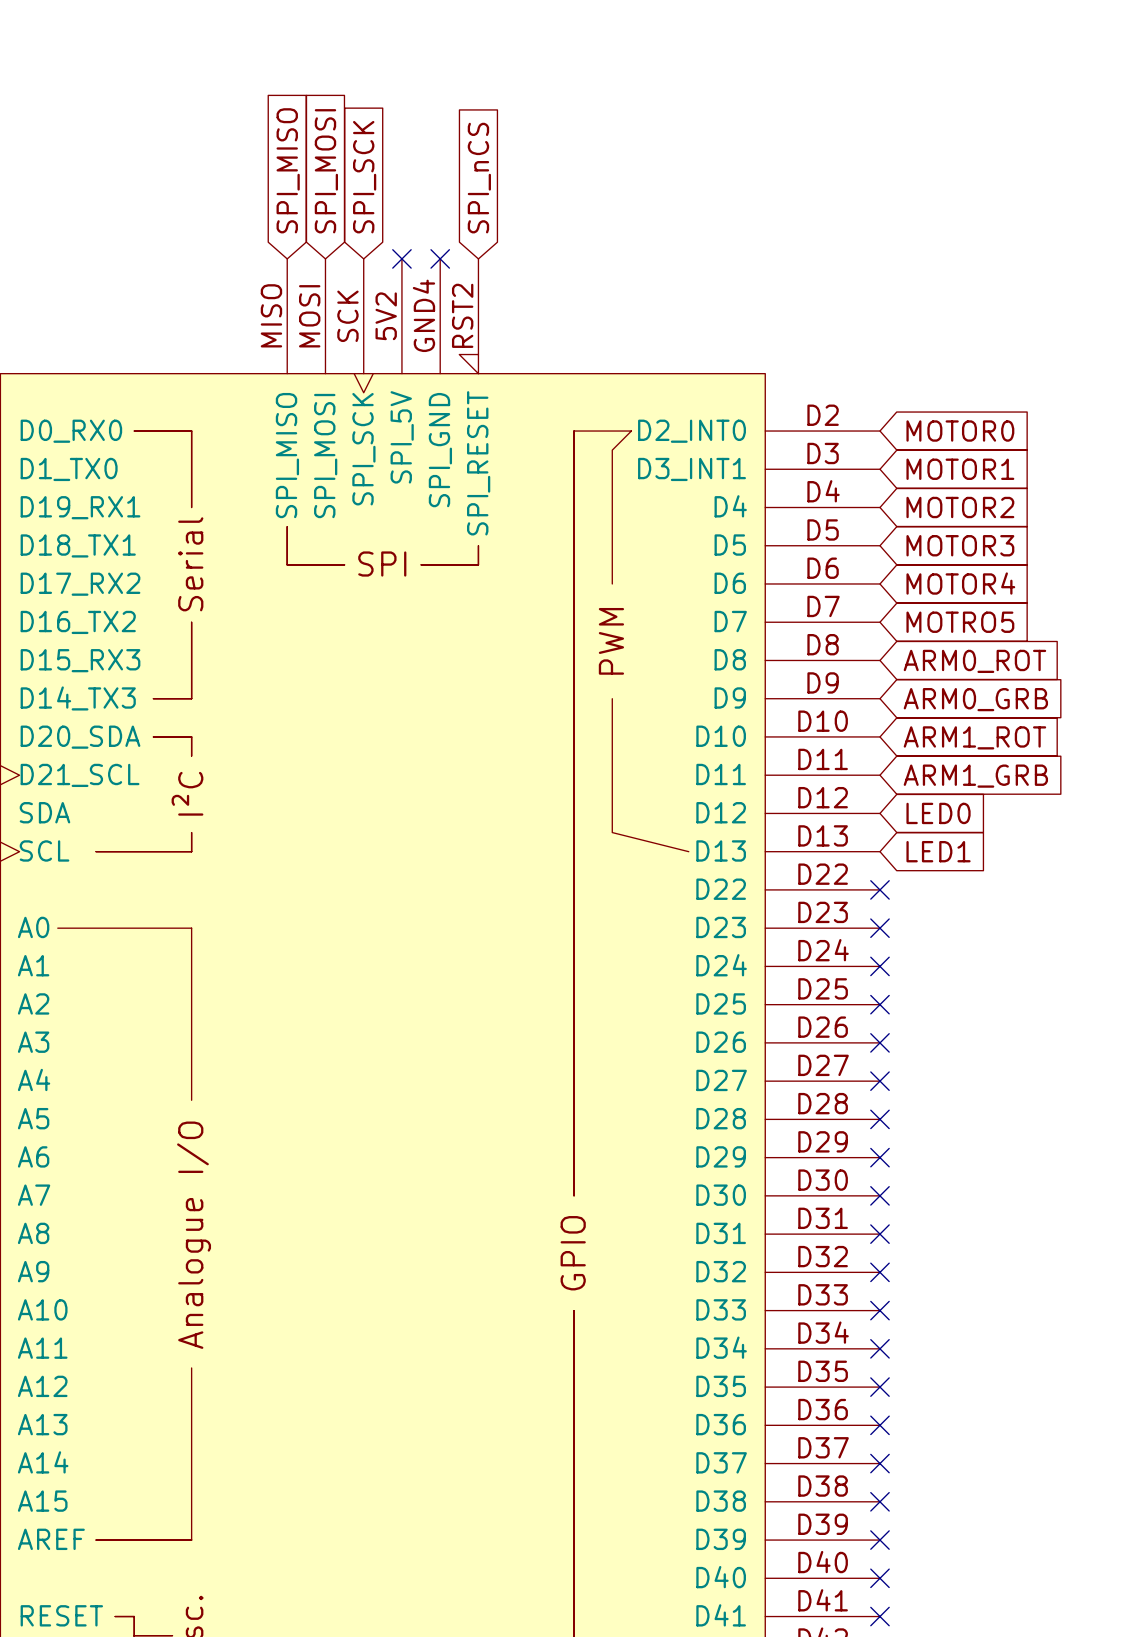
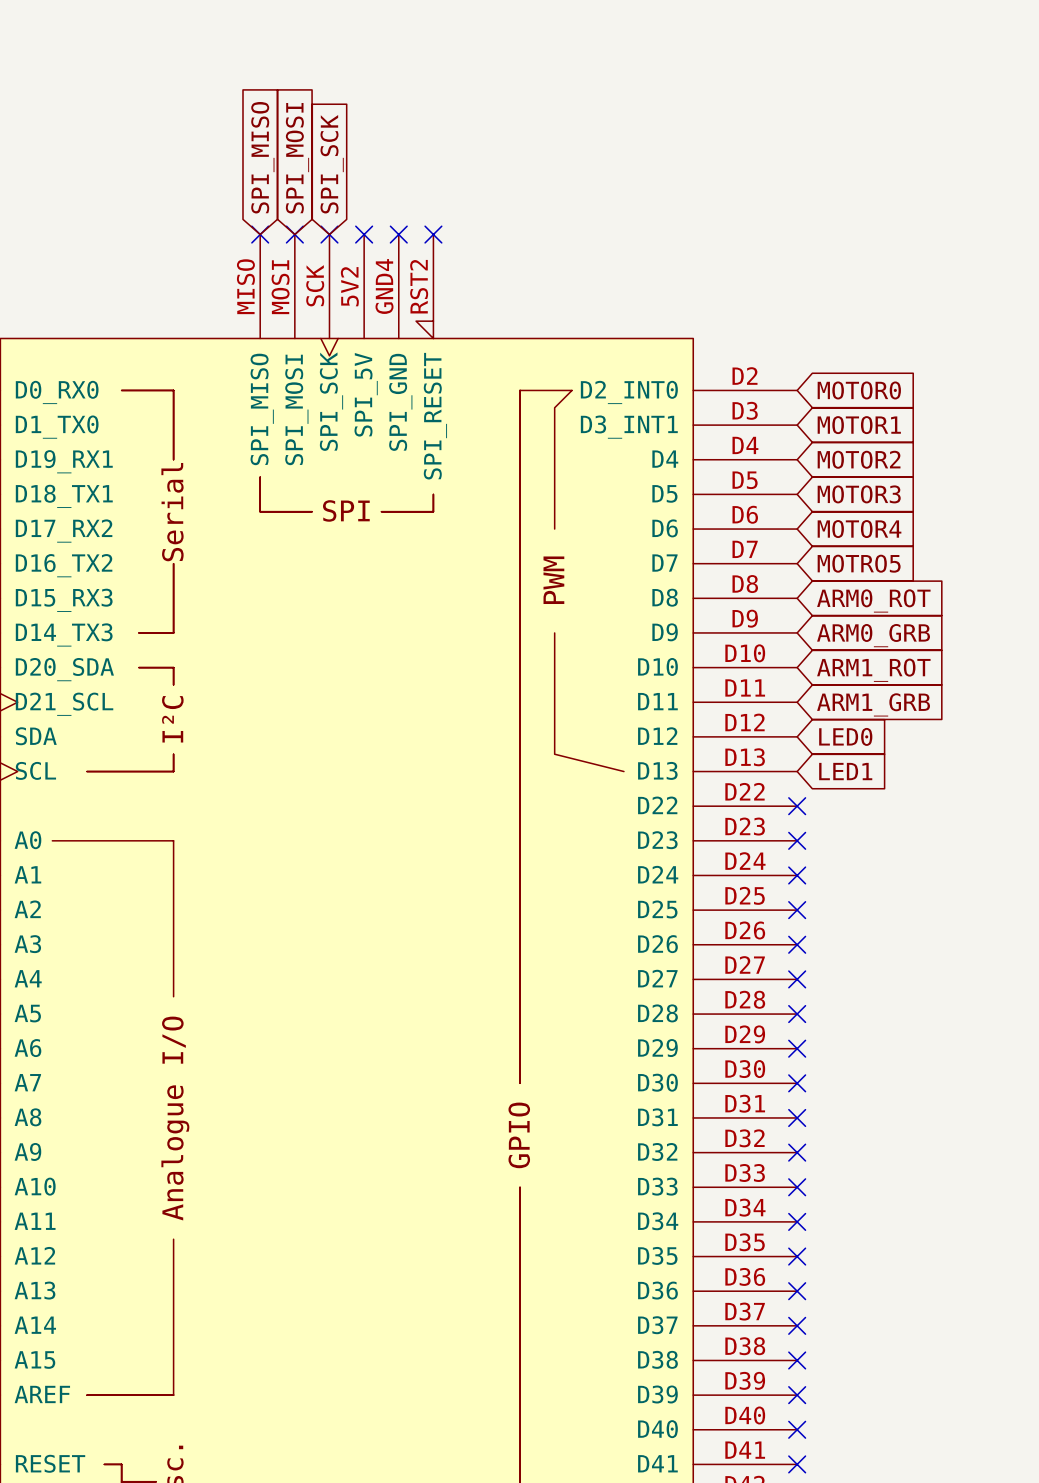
global label: SPI_nCS (479, 178) -> none
no-connect mark: none -> (260, 234)
no-connect mark: none -> (294, 234)
no-connect mark: none -> (329, 234)
no-connect mark: none -> (433, 234)

